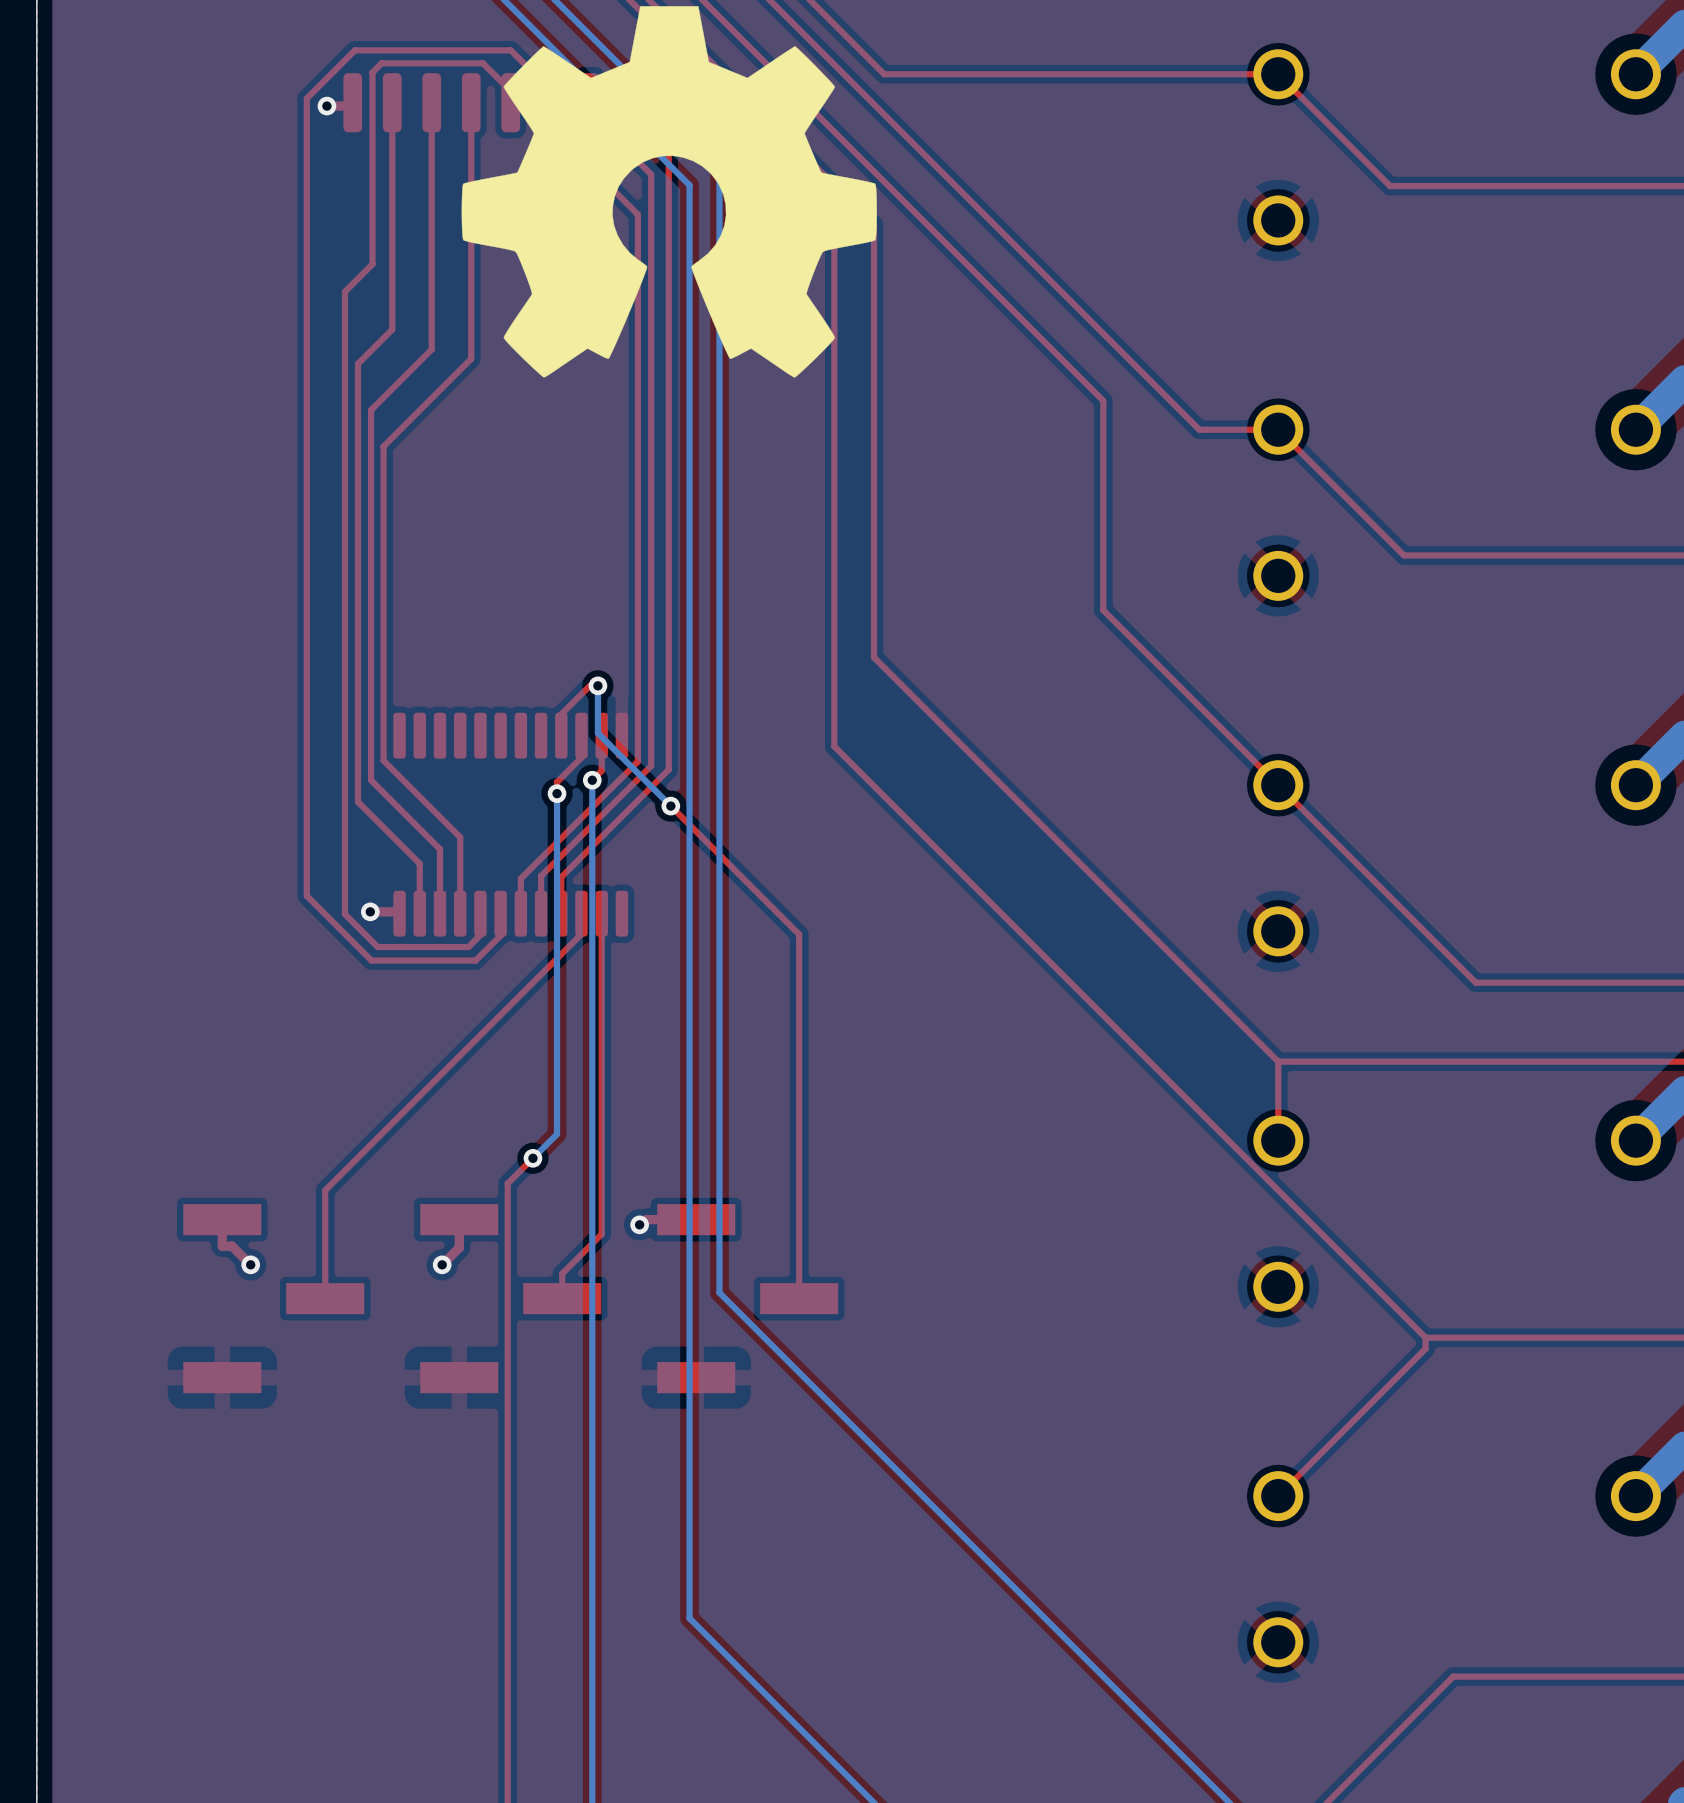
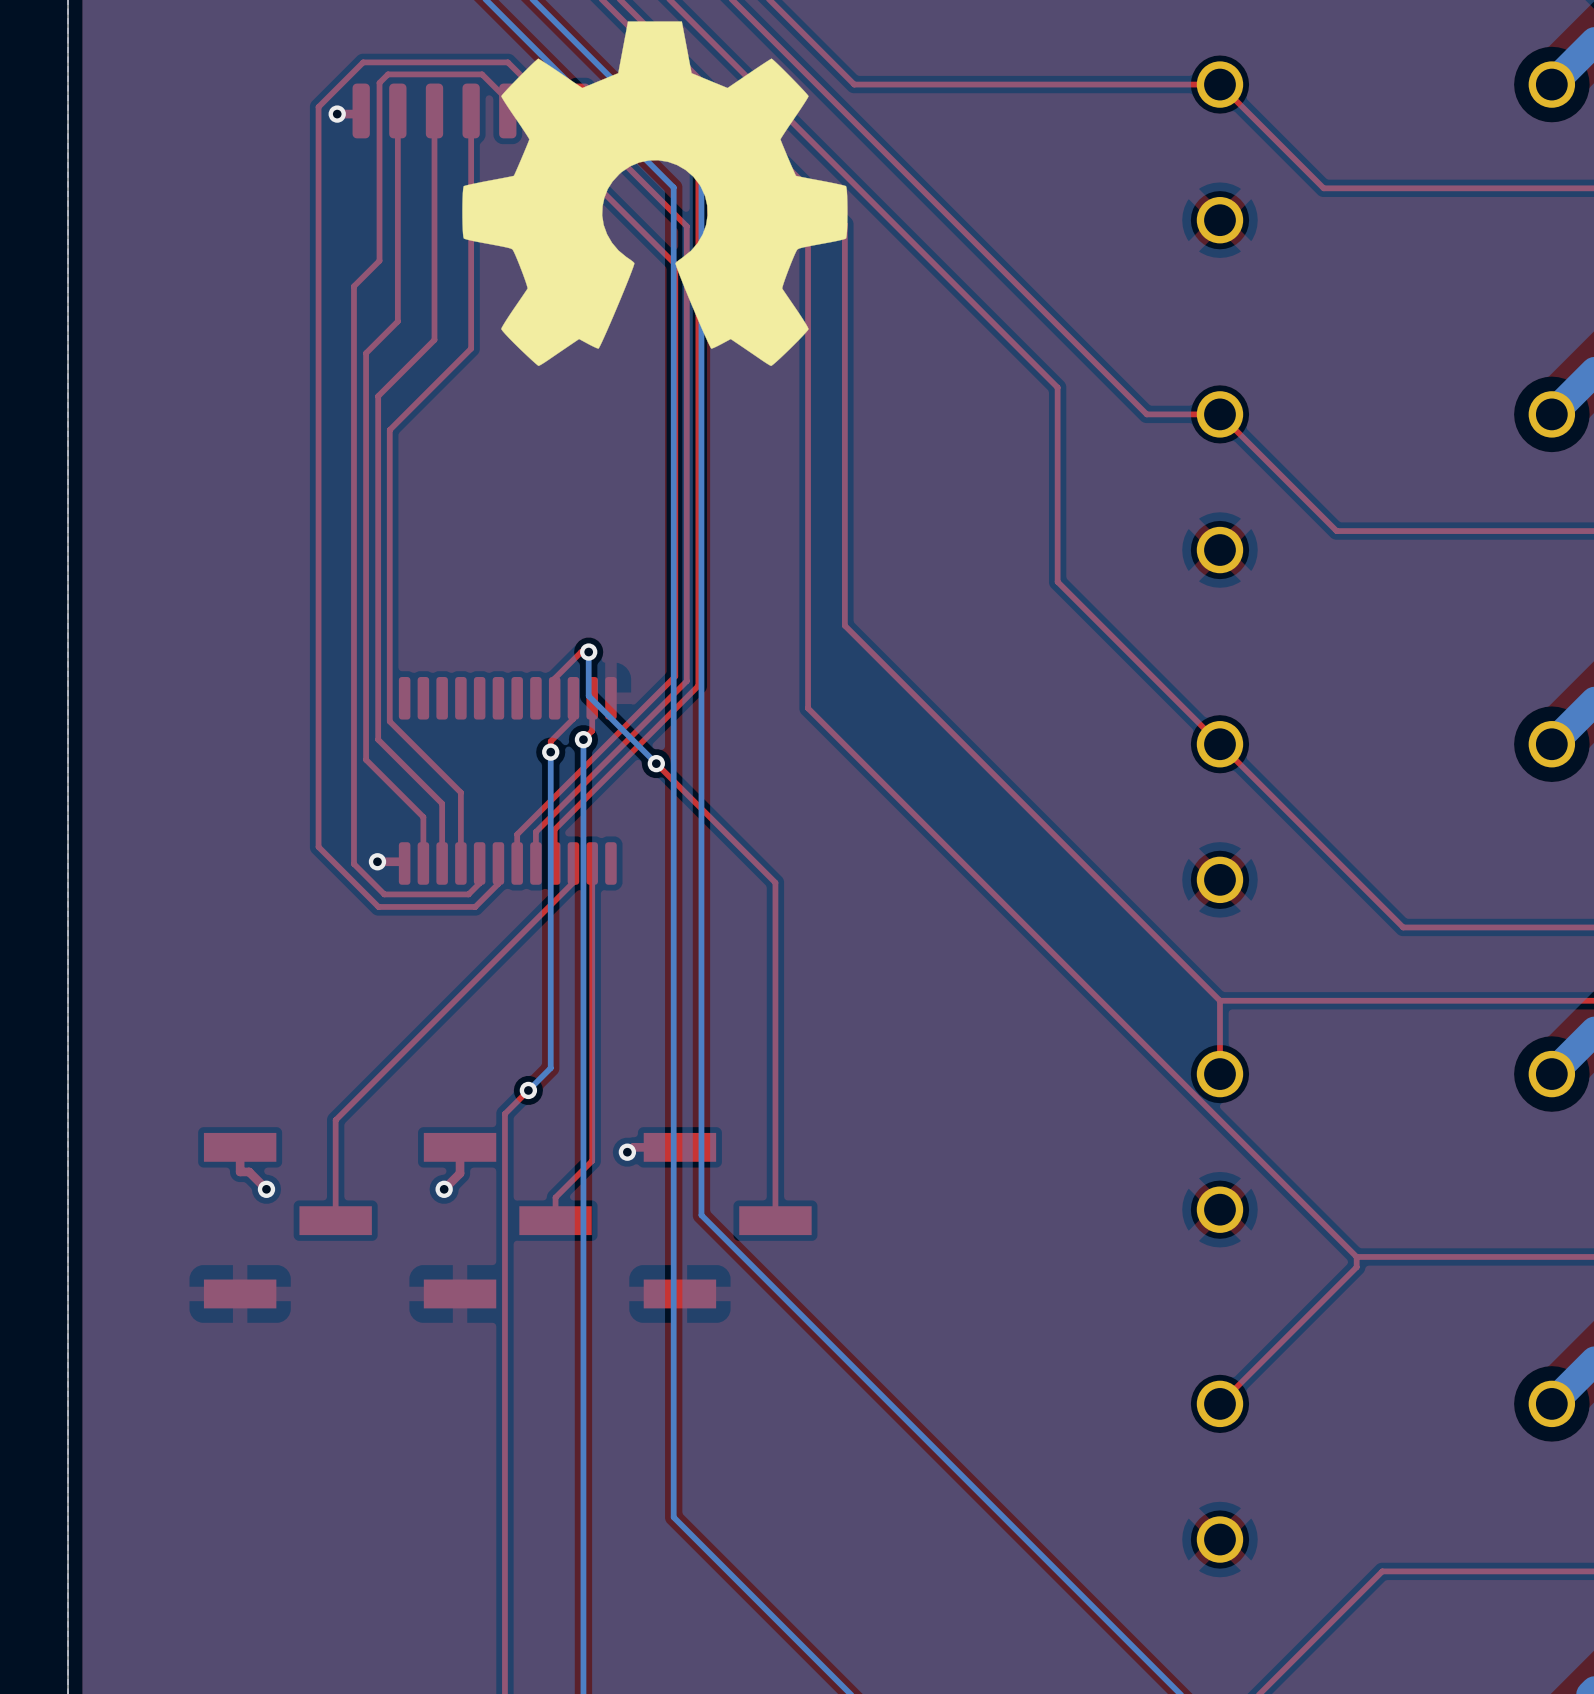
top track: (668, 102) (668, 769) -> (654, 110) (698, 154) (698, 685) (654, 729)
top track: (651, 174) (651, 765) (541, 876) (541, 879) -> (638, 177) (686, 226) (686, 681) (535, 832)
top track: (637, 214) (637, 761) (520, 878) (520, 882) -> (625, 214) (675, 264) (675, 676) (517, 834)

